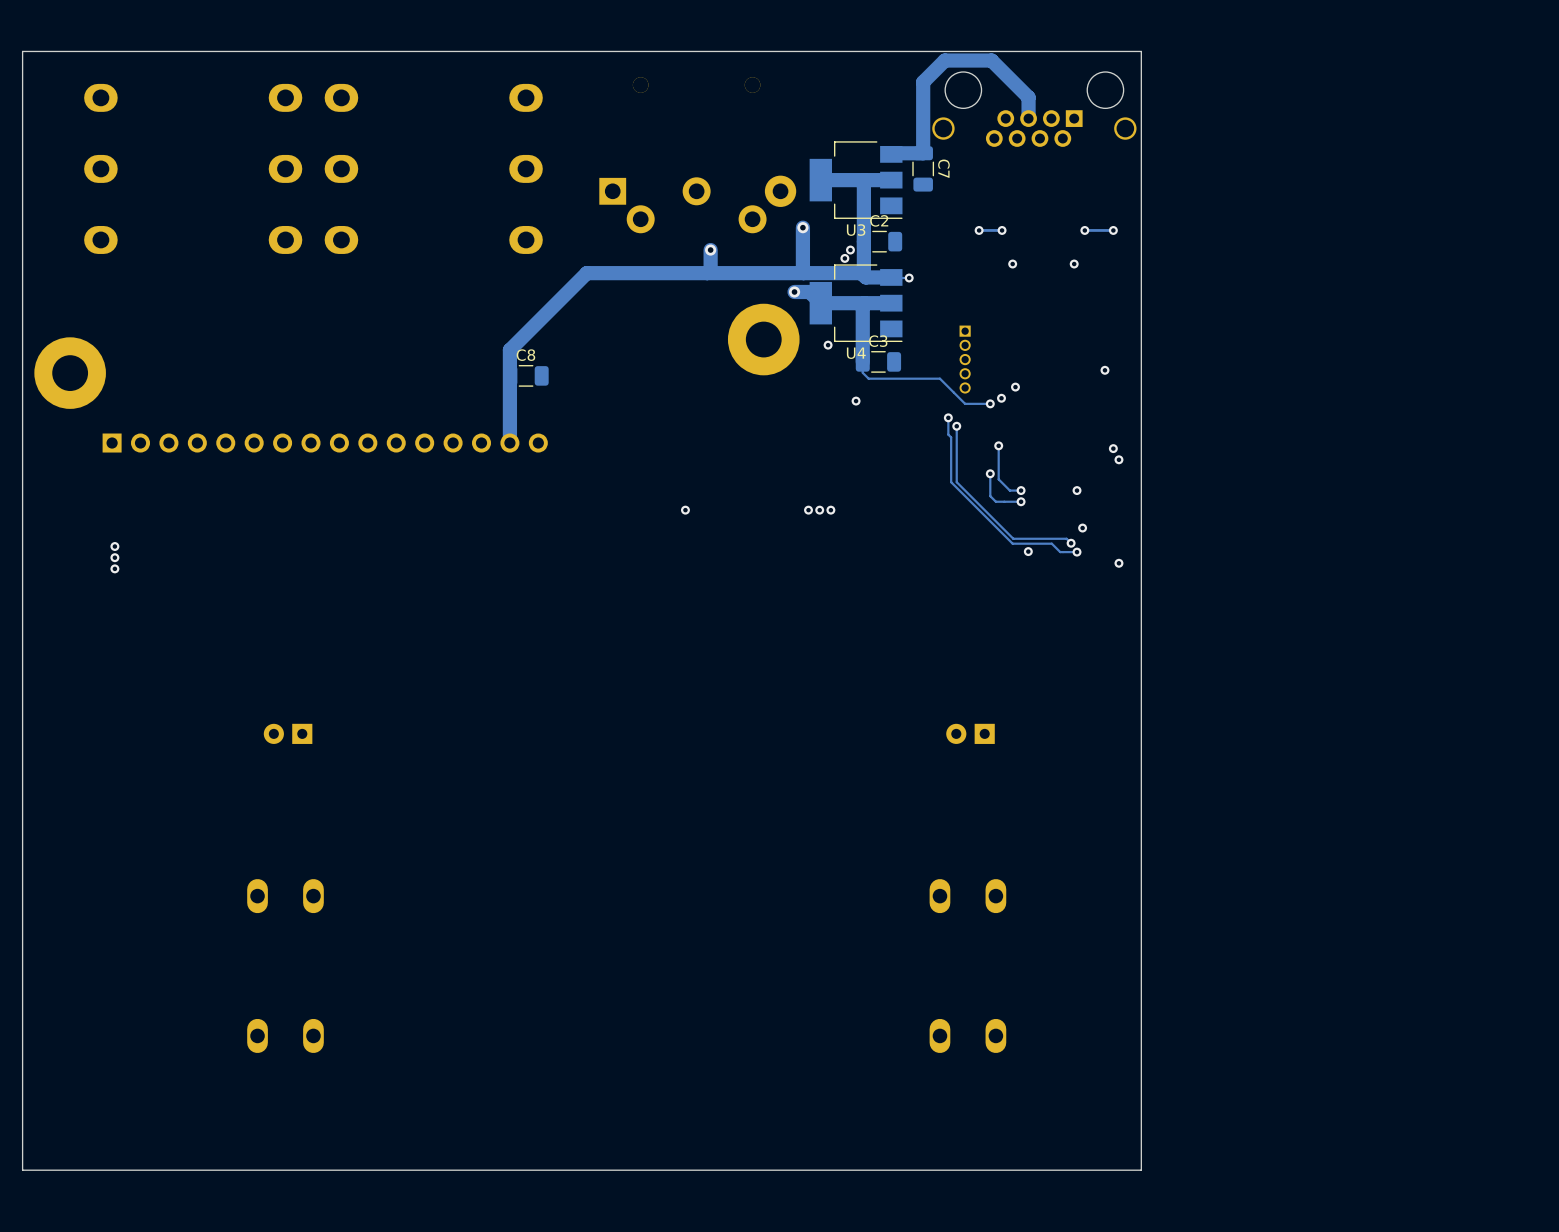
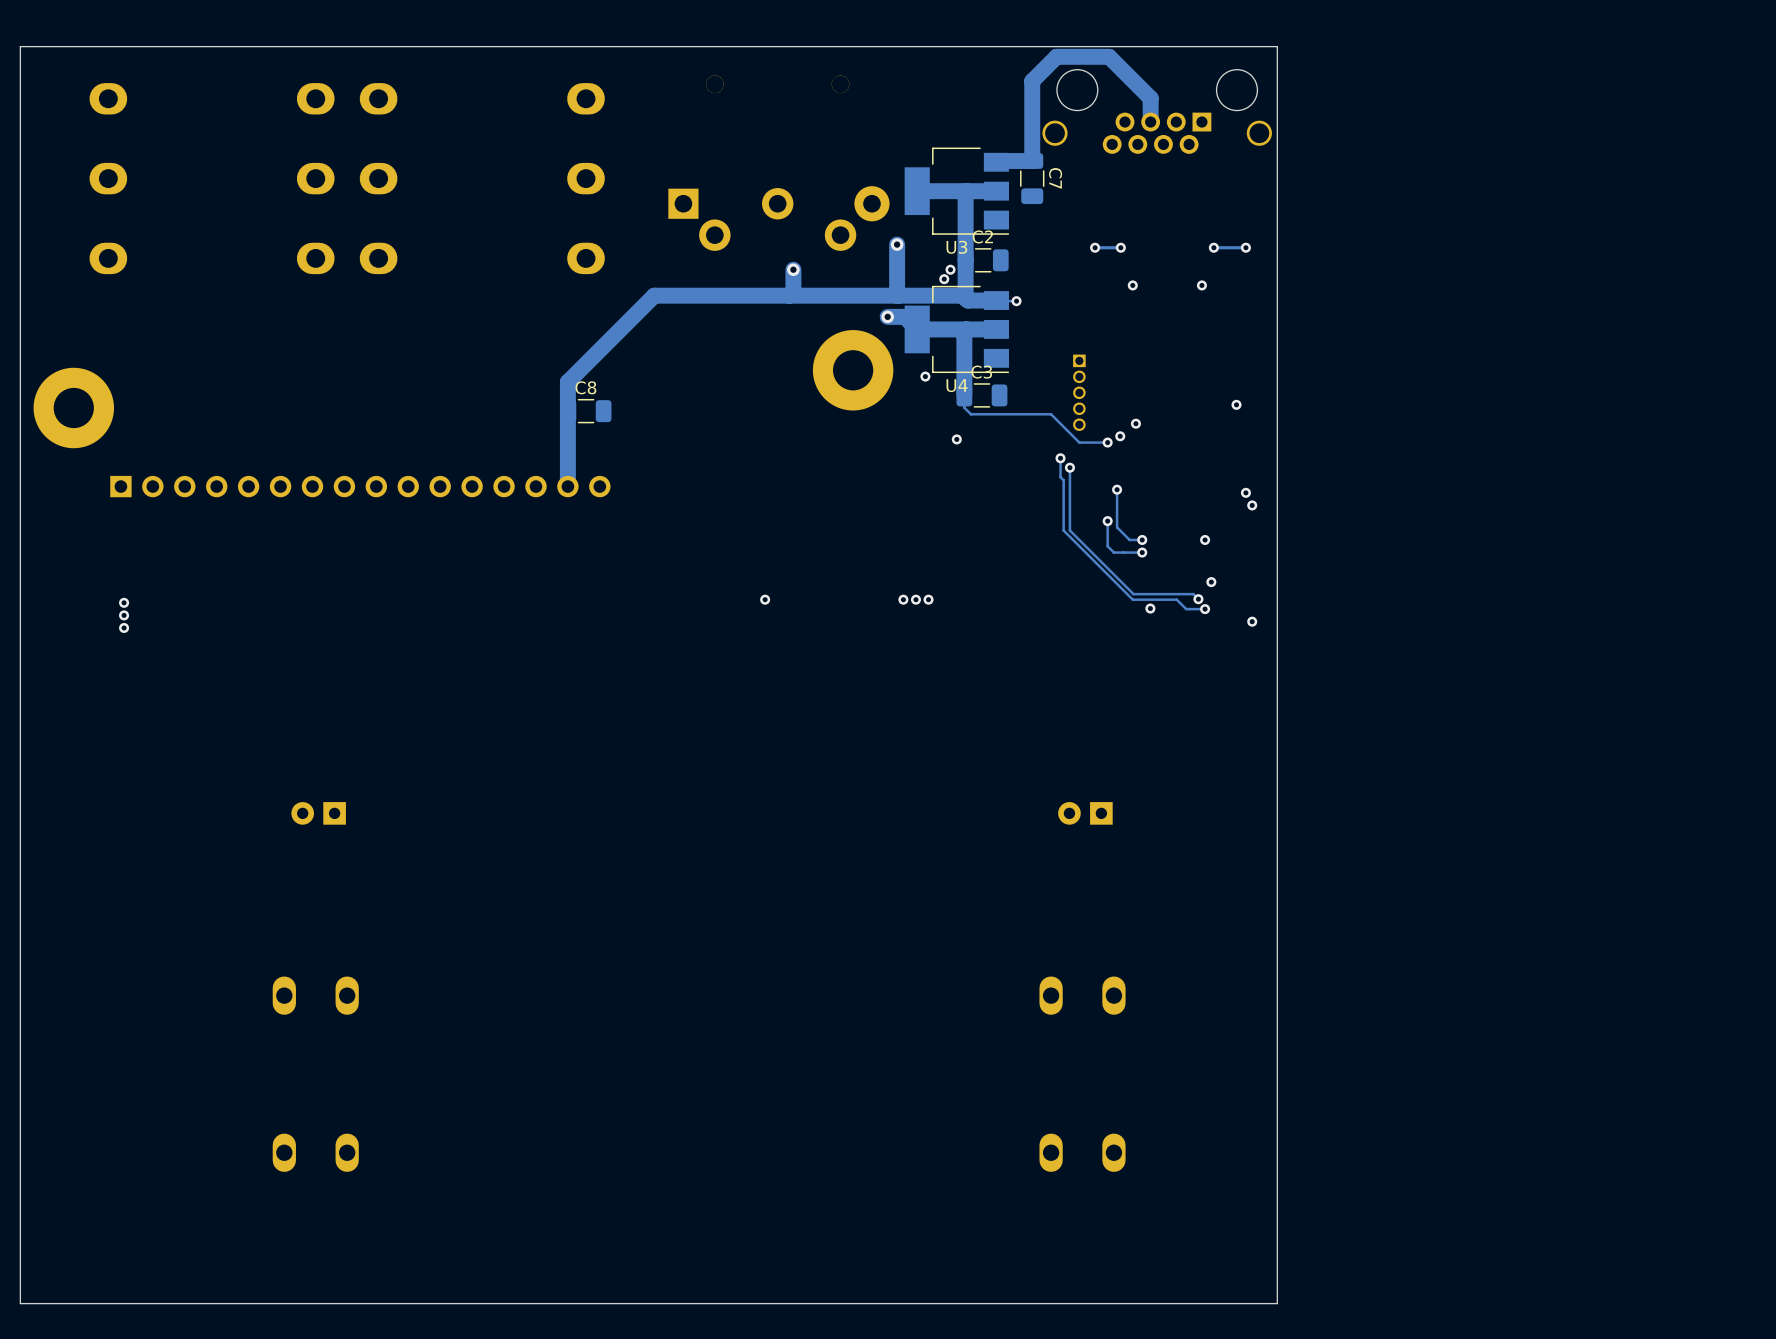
via position: (685, 510) -> (765, 599)
via: (808, 510) -> none
via: (819, 510) -> none
via: (830, 510) -> none
via: none -> (903, 599)
via: none -> (915, 599)
via: none -> (928, 599)

